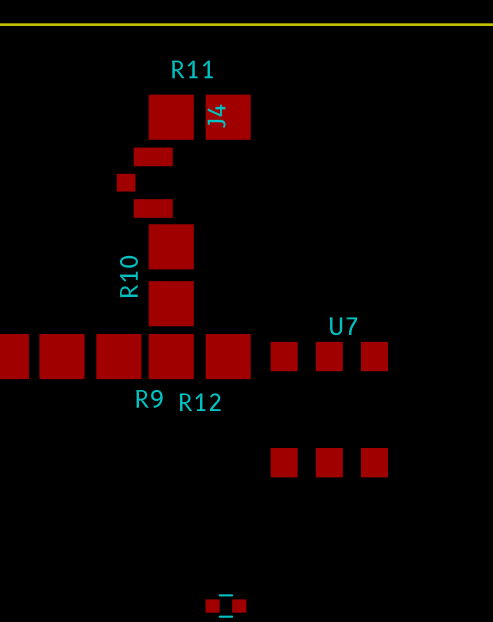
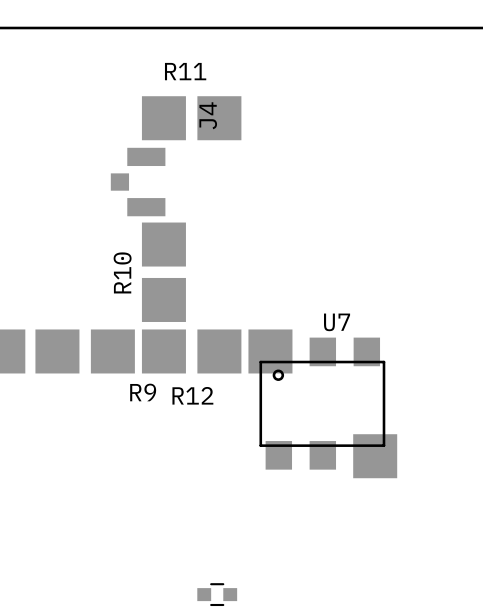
U7 footprint: [270, 341, 389, 478] -> [248, 329, 398, 479]

